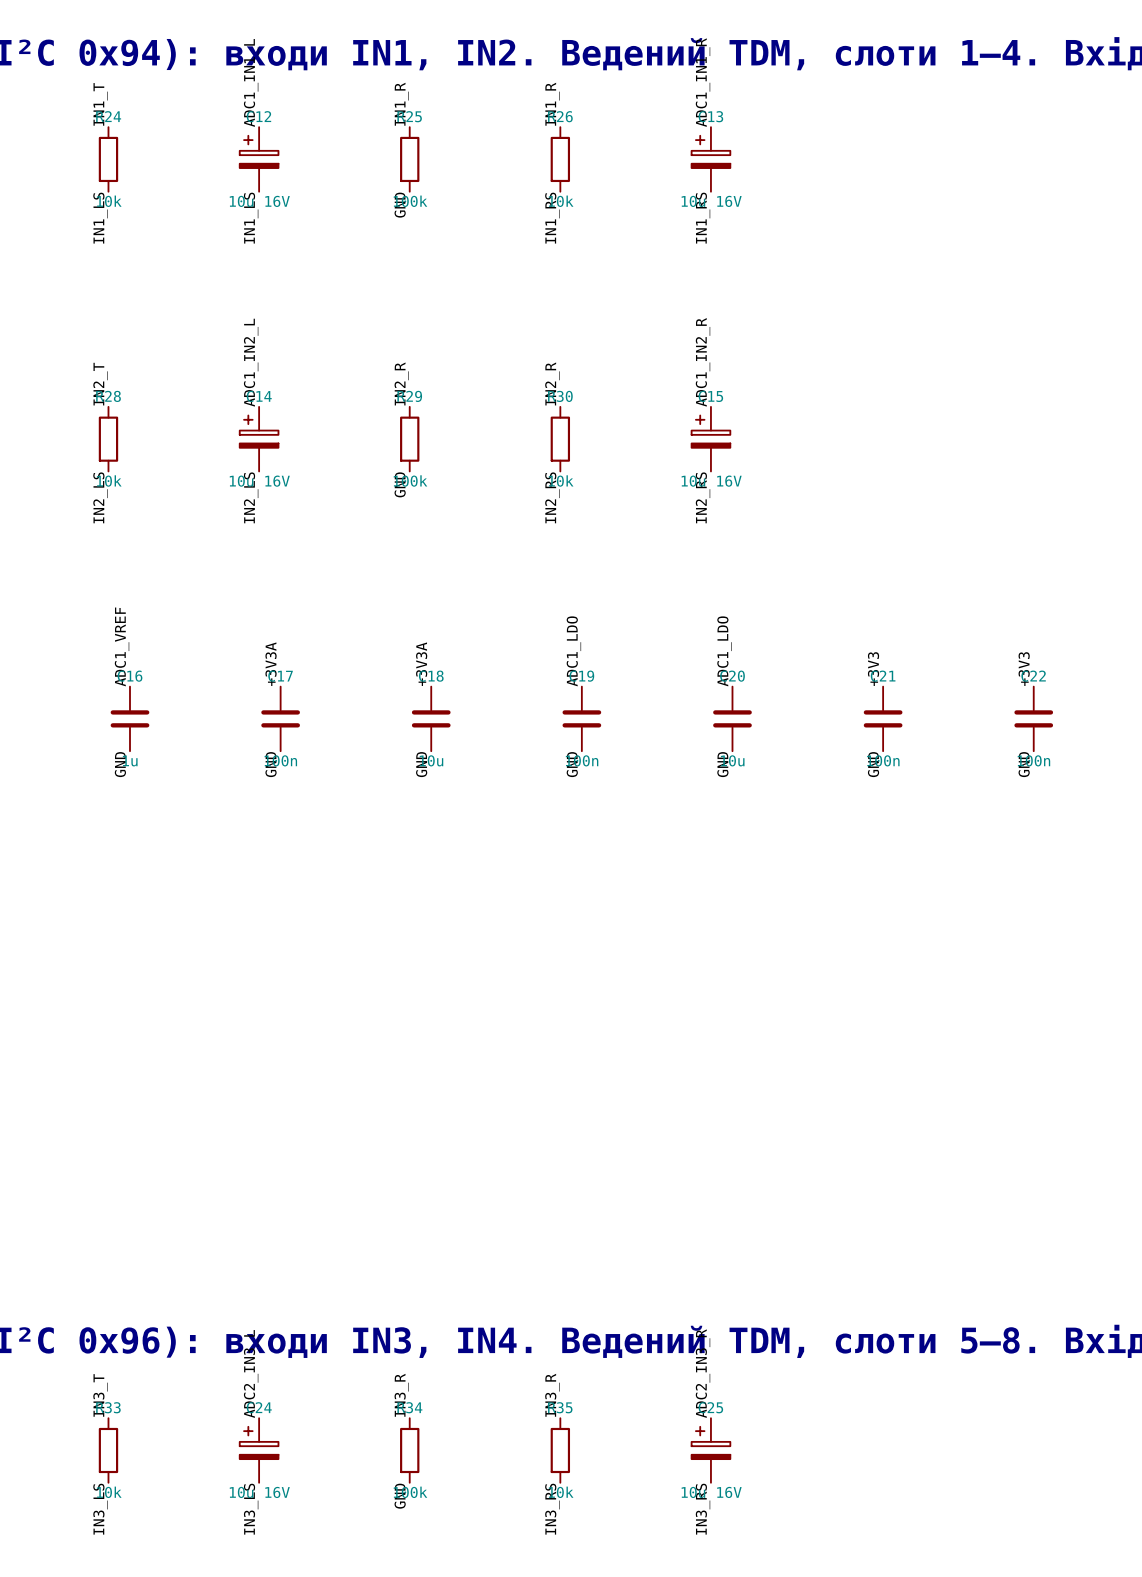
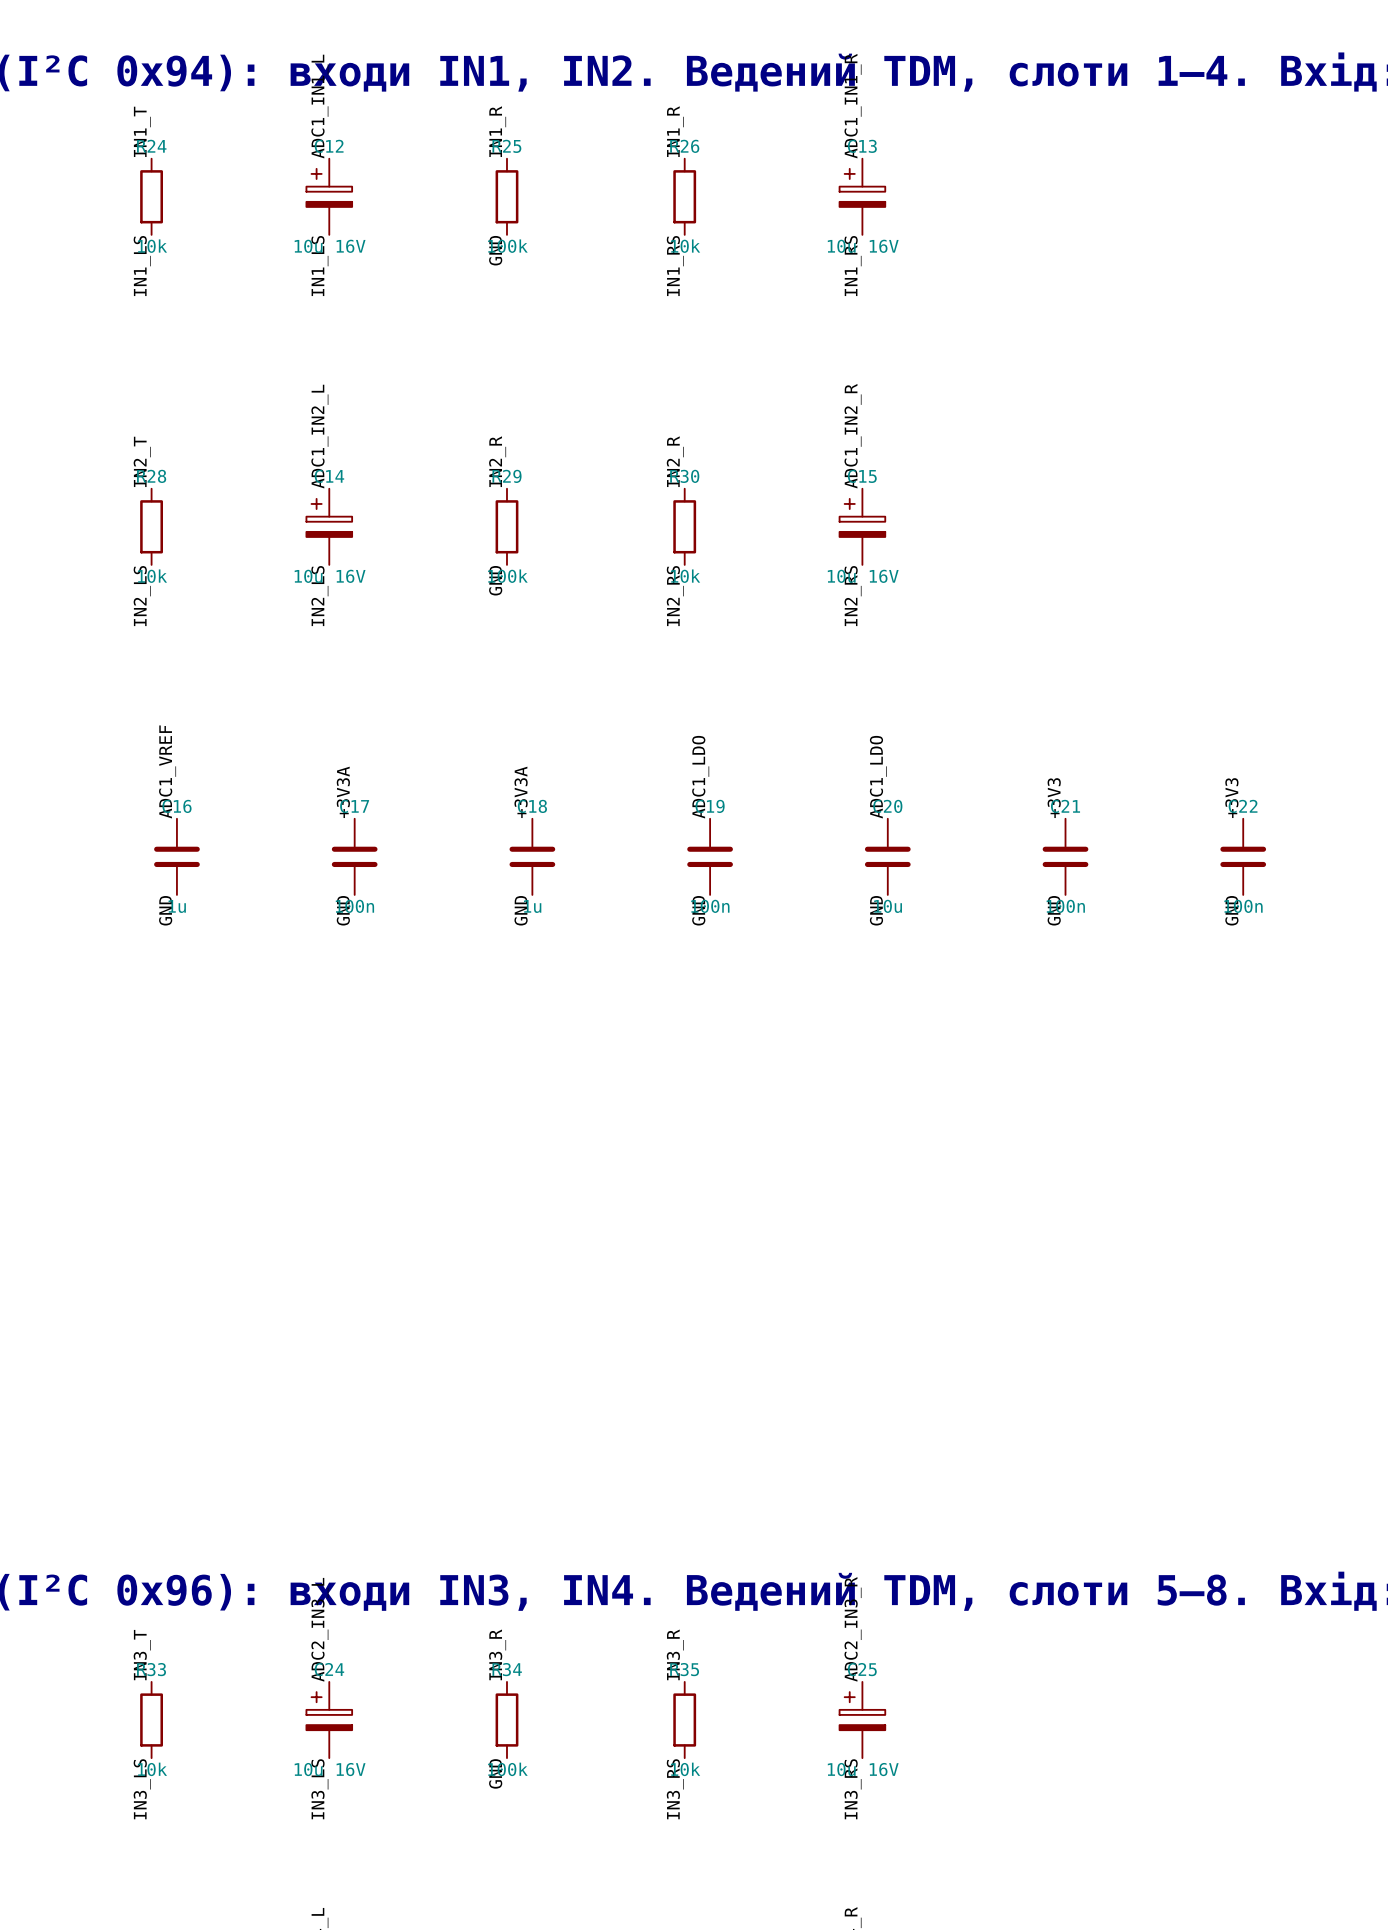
C18 value: 10u (431, 760) -> 1u (532, 906)

